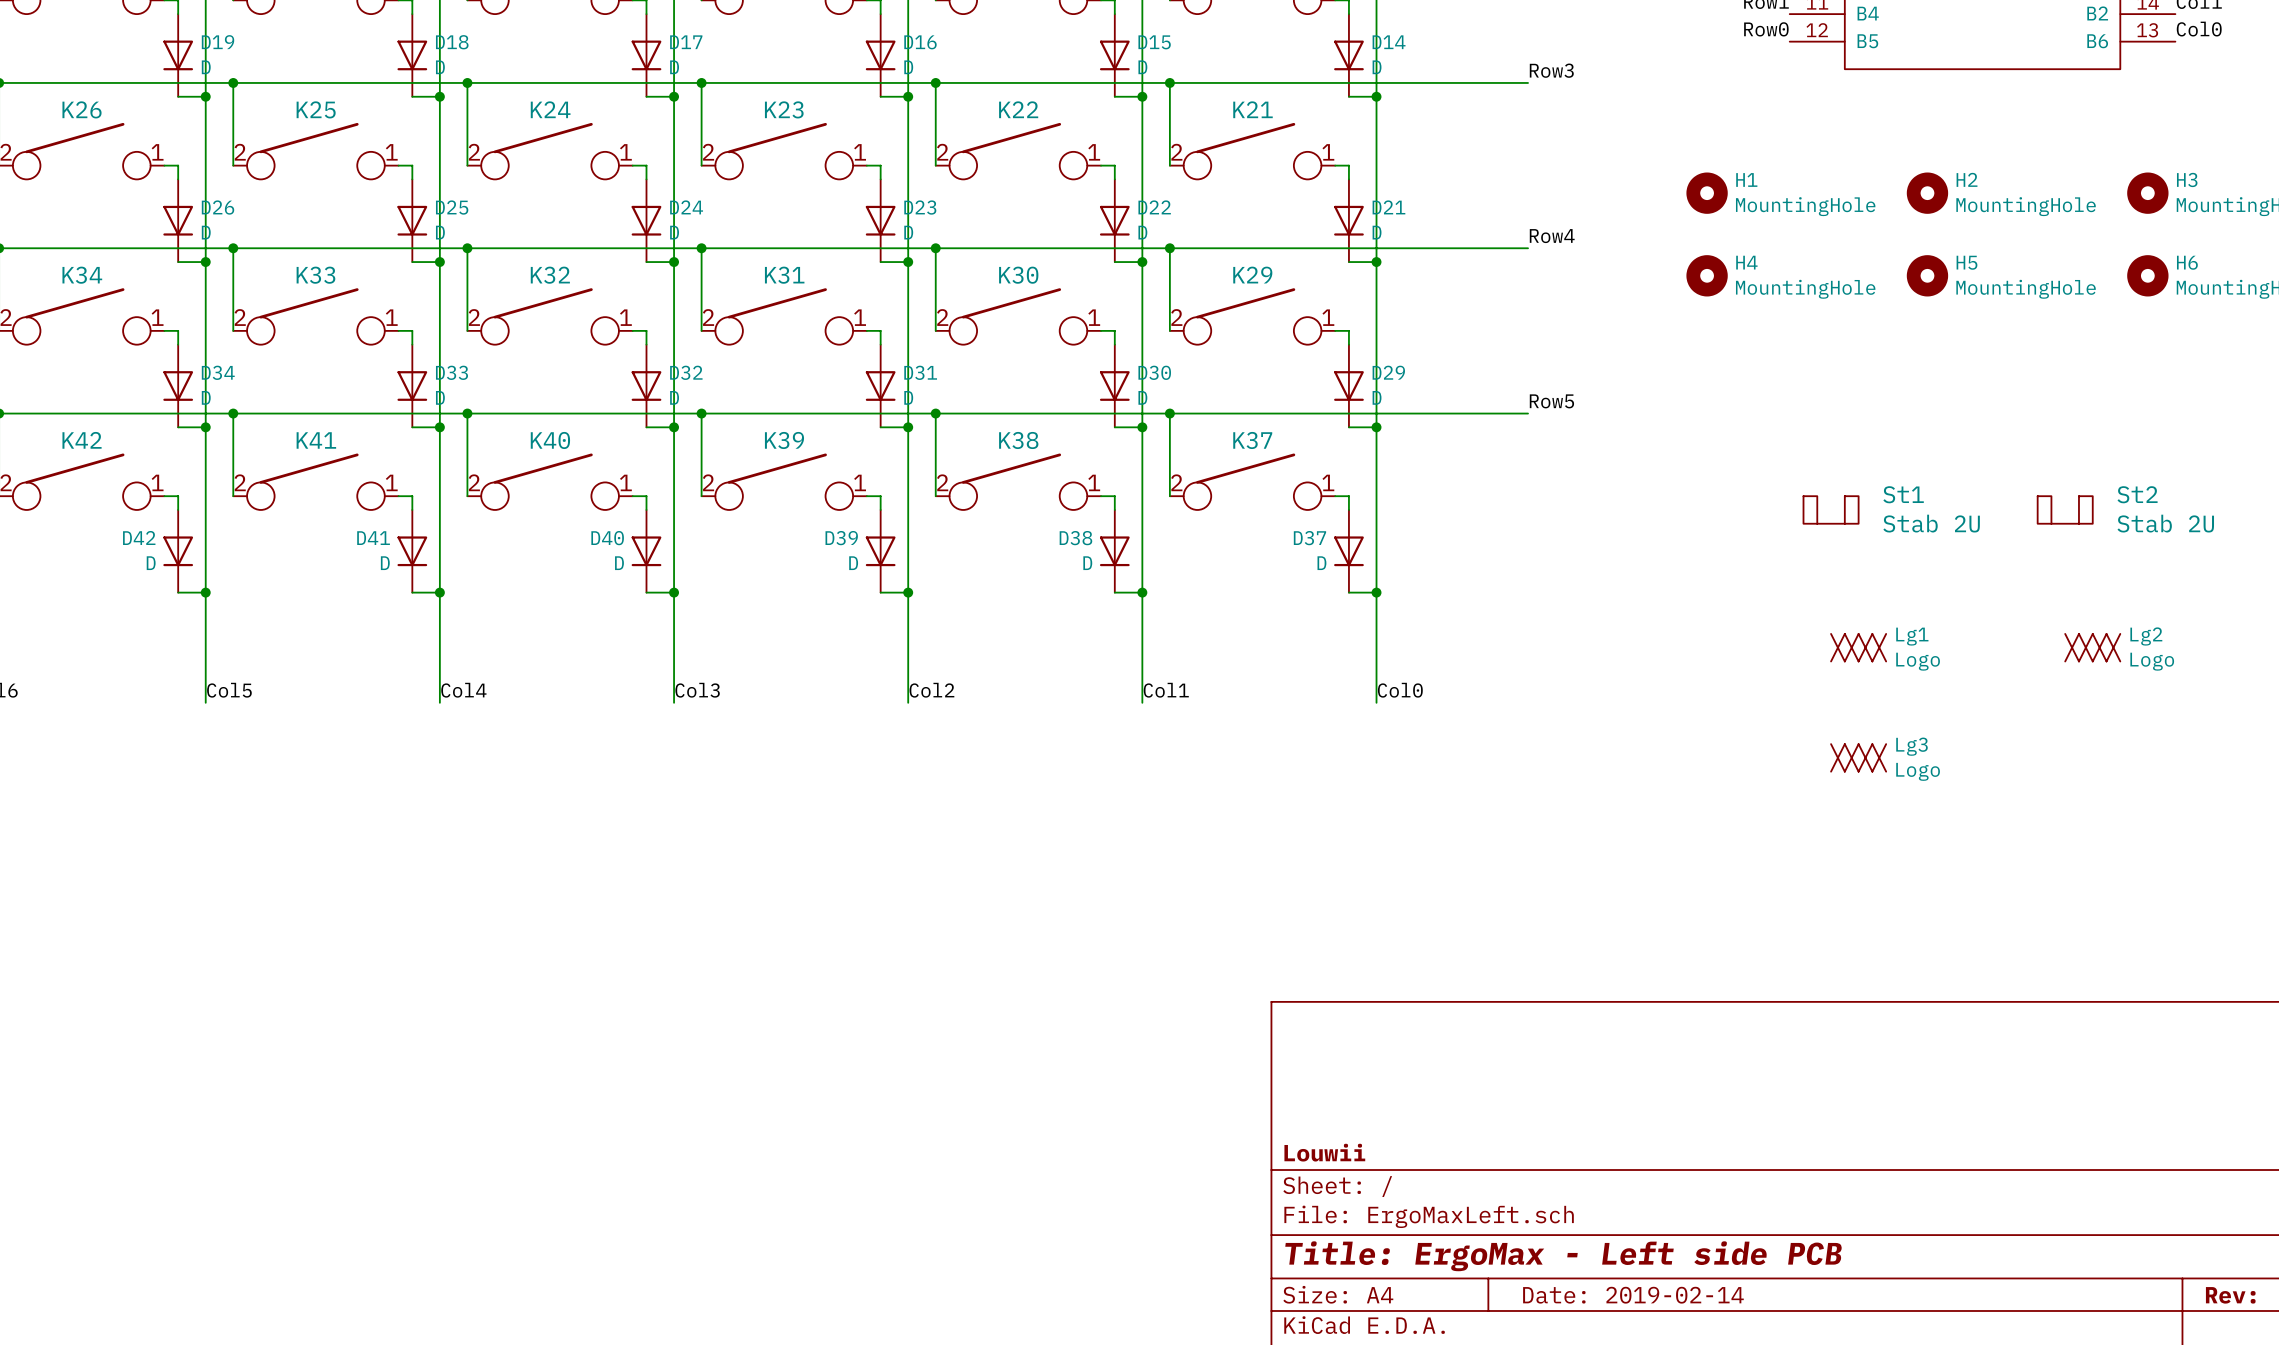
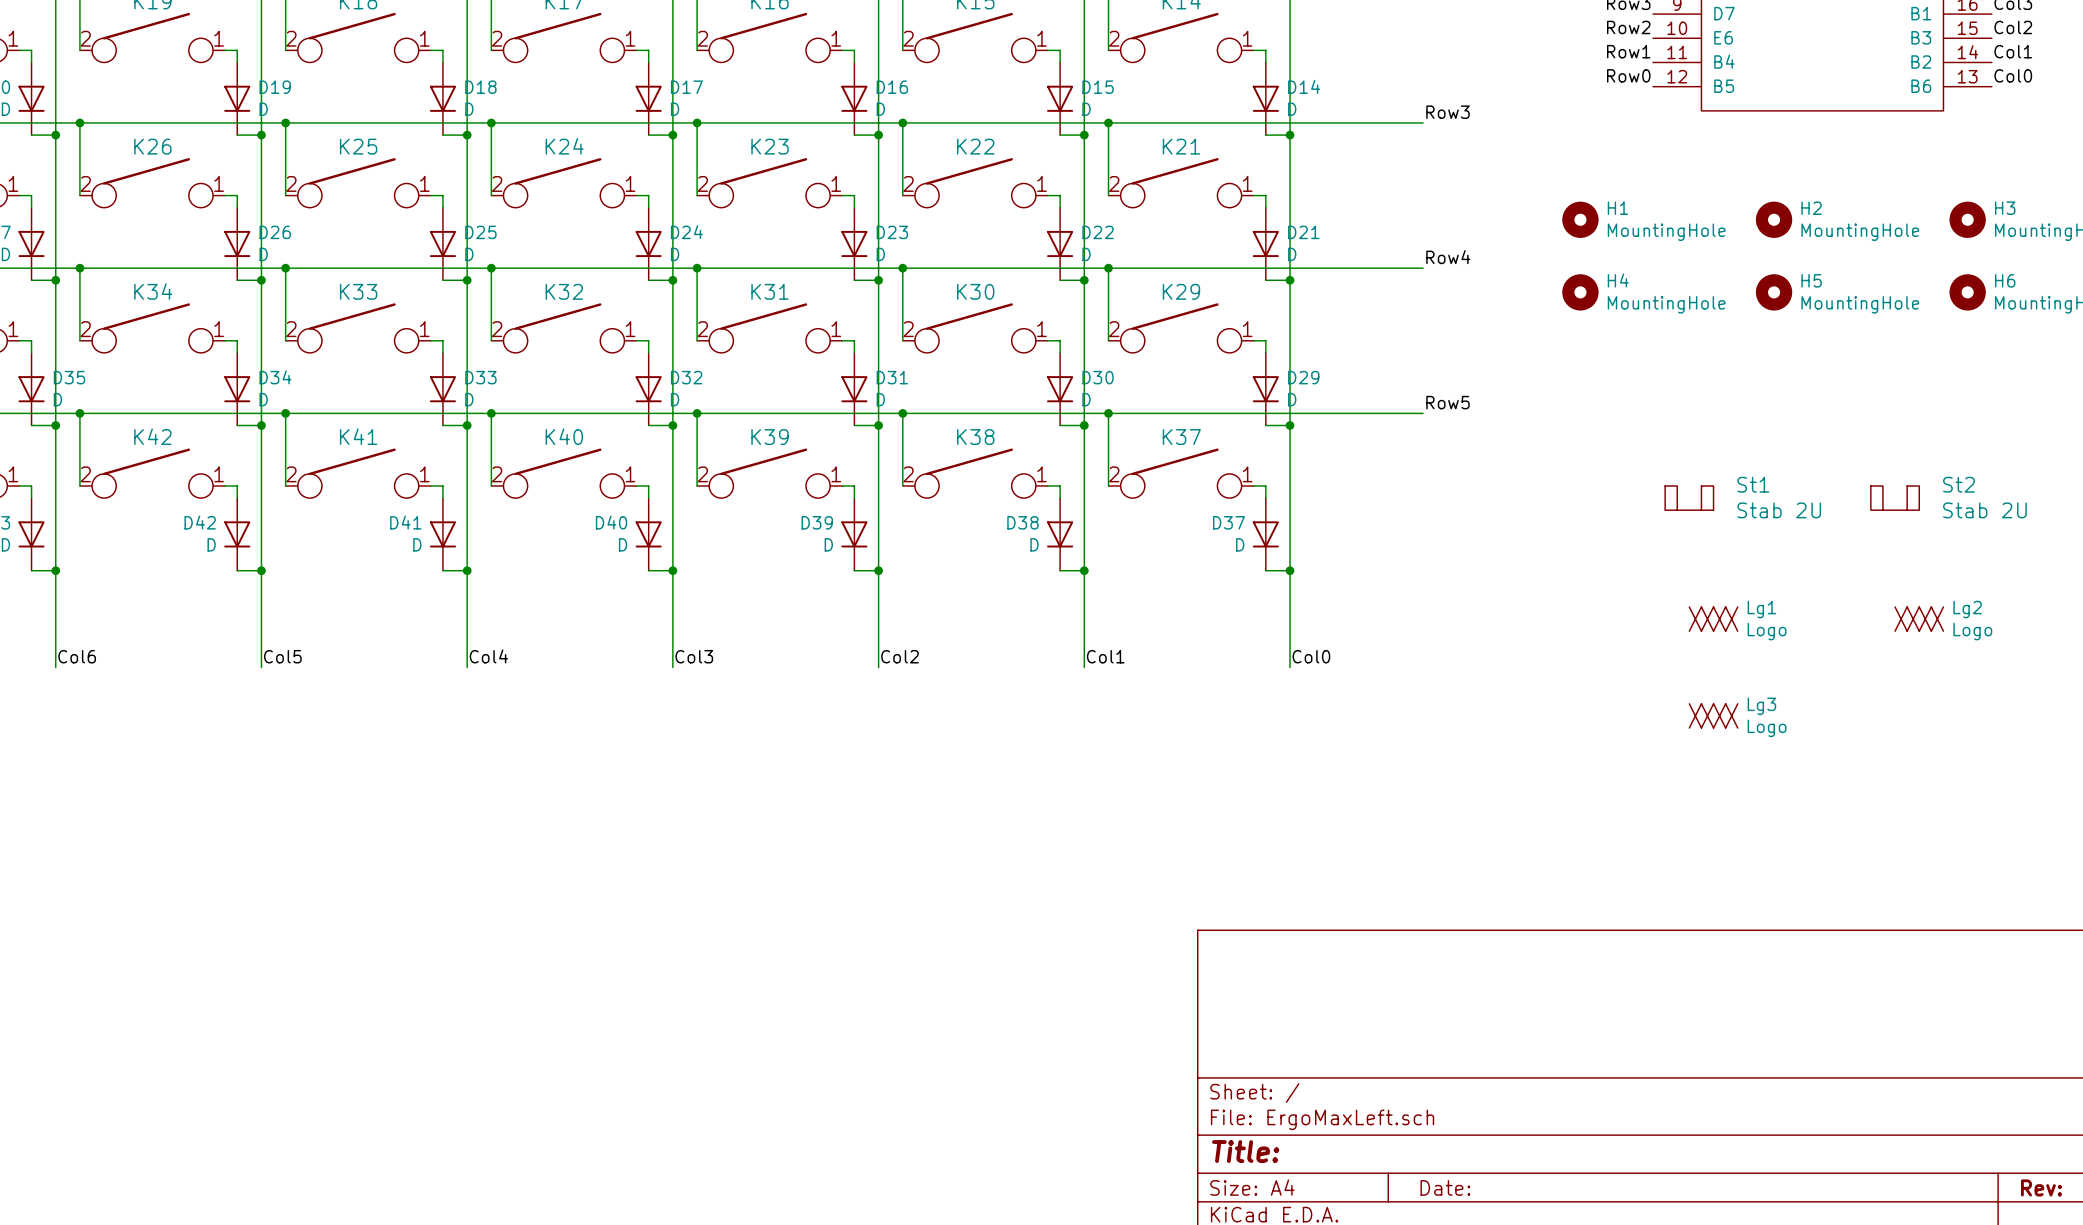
title block: Louwii (1324, 1152) -> none
title block: Title: ErgoMax - Left side PCB (1563, 1256) -> Title: (1245, 1151)
title block: Date: 2019-02-14 (1633, 1295) -> Date: (1445, 1187)

